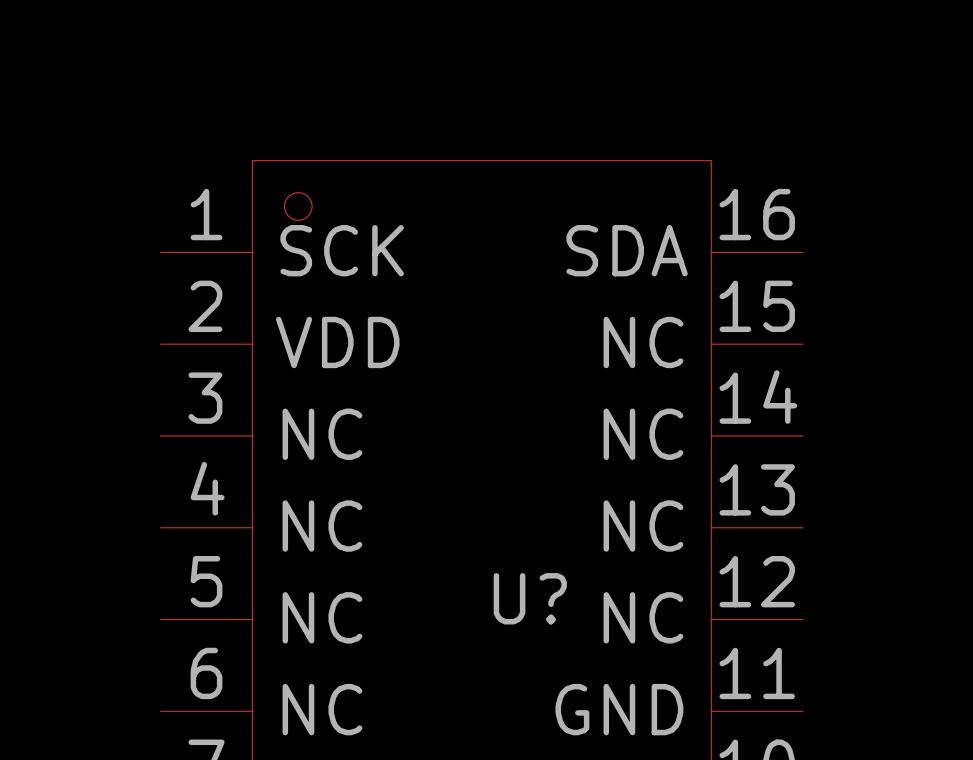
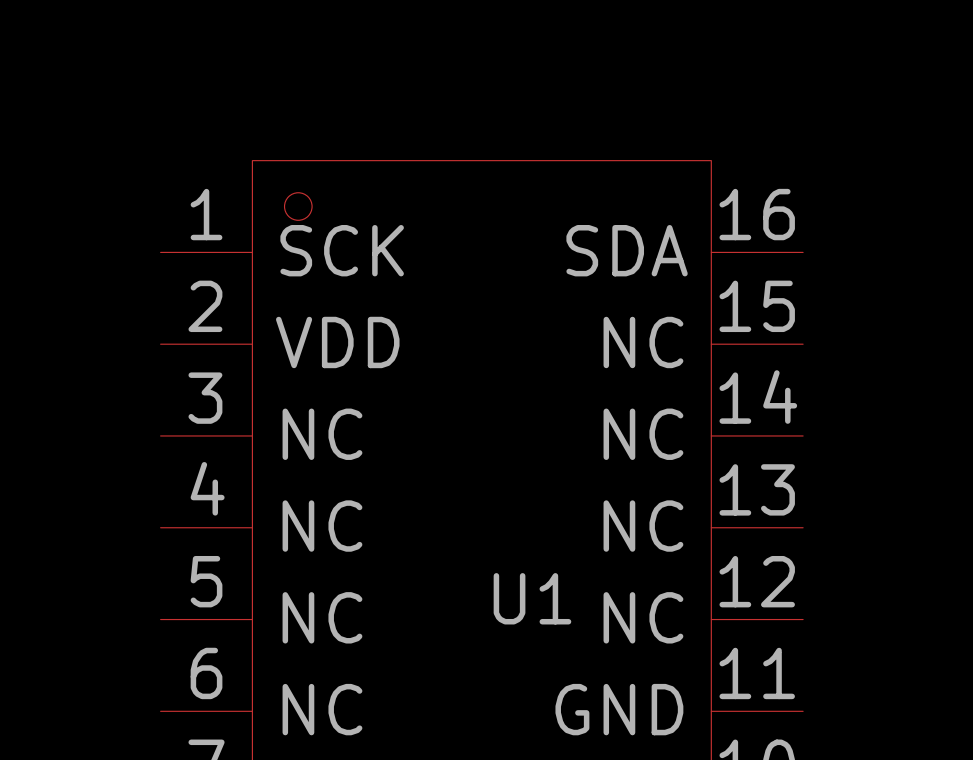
U? name: U? (530, 598) -> U1 (532, 598)

